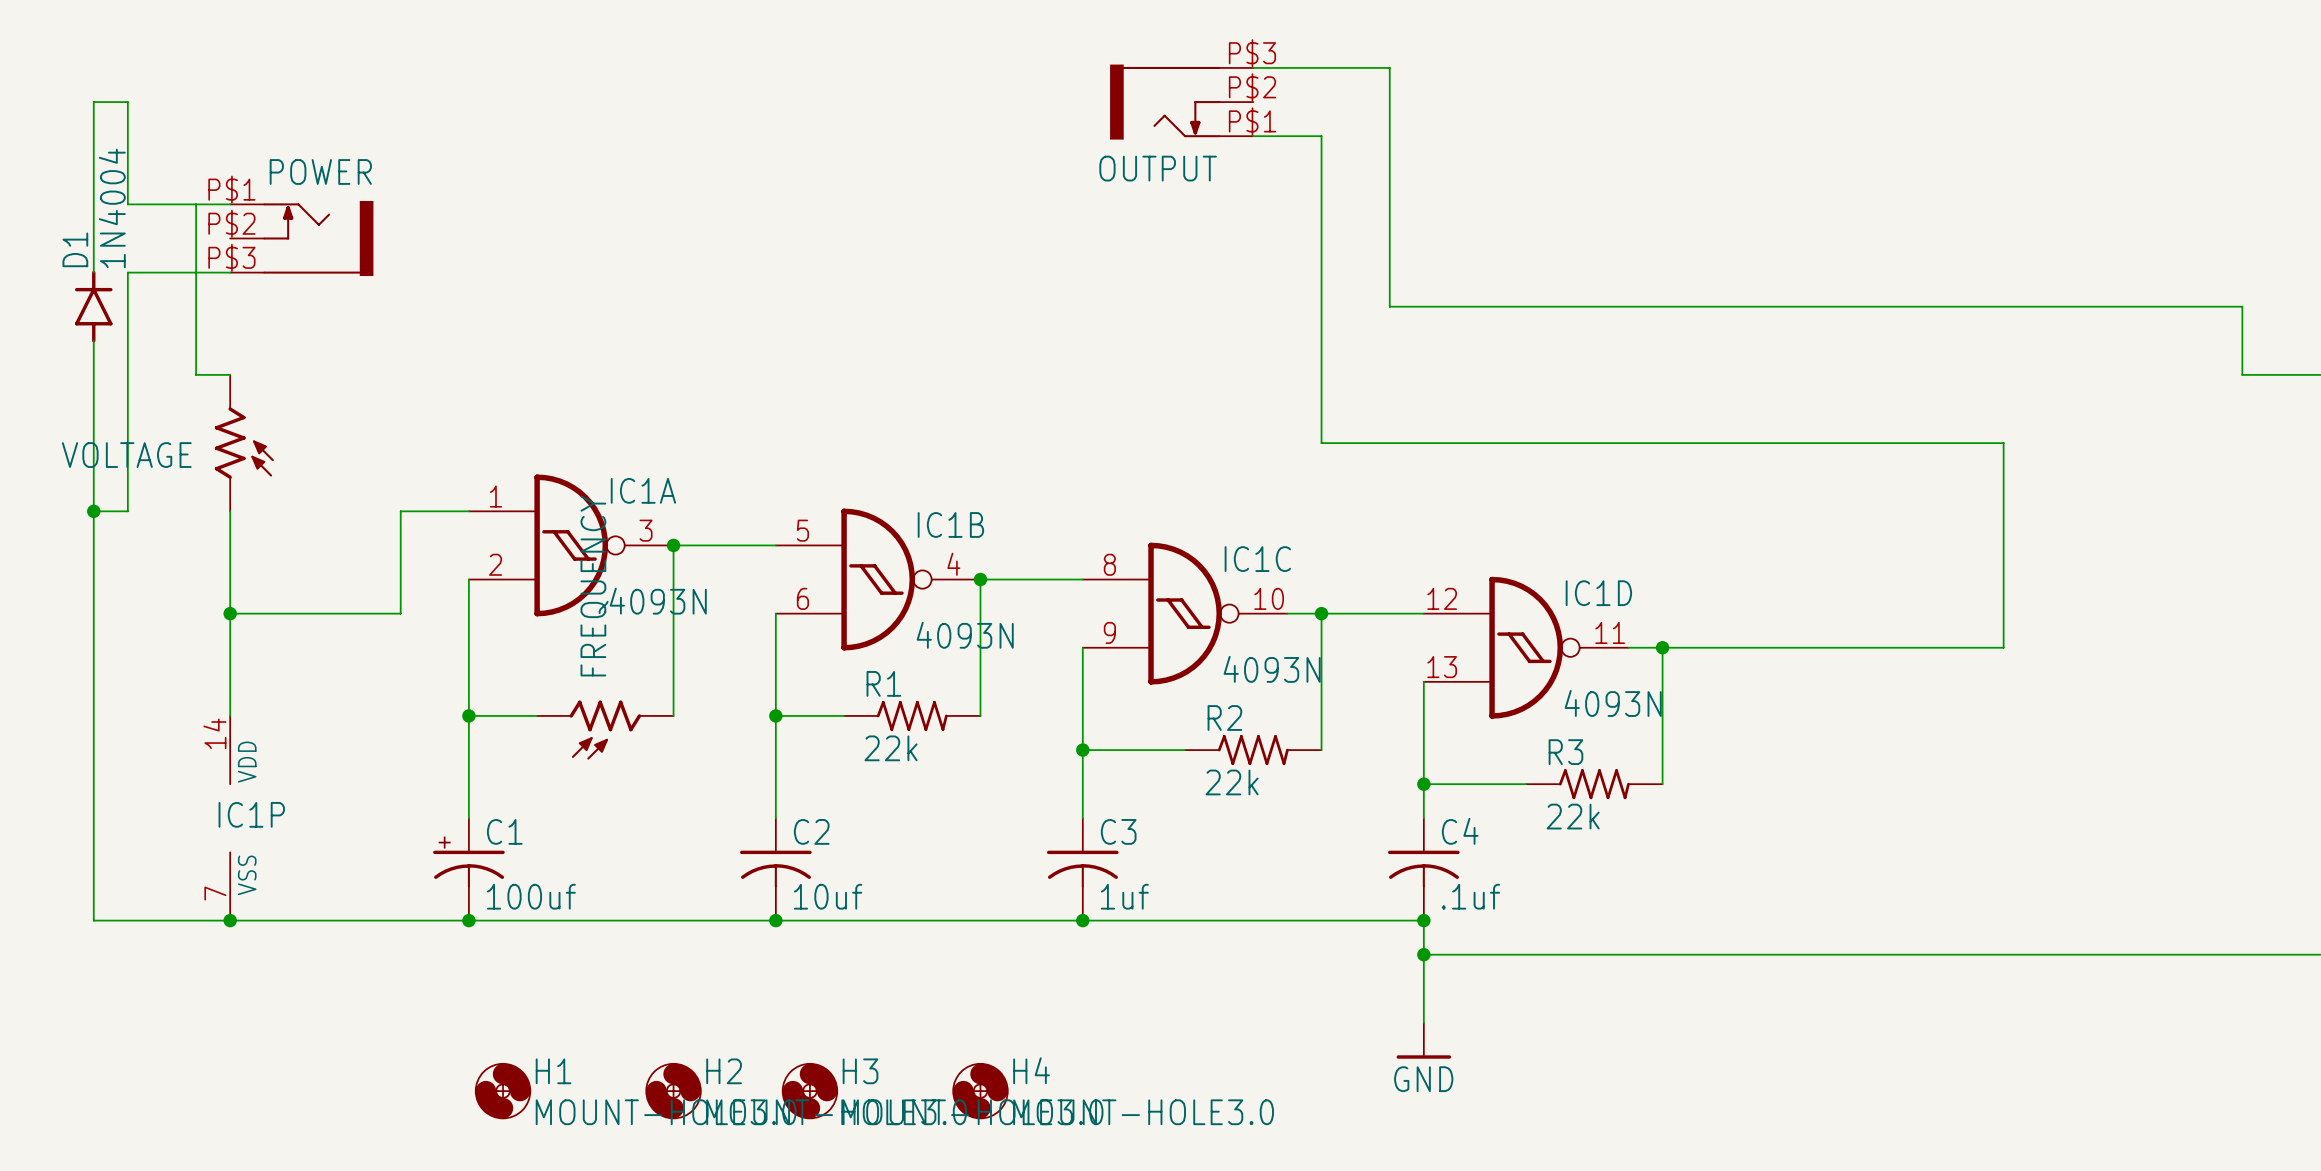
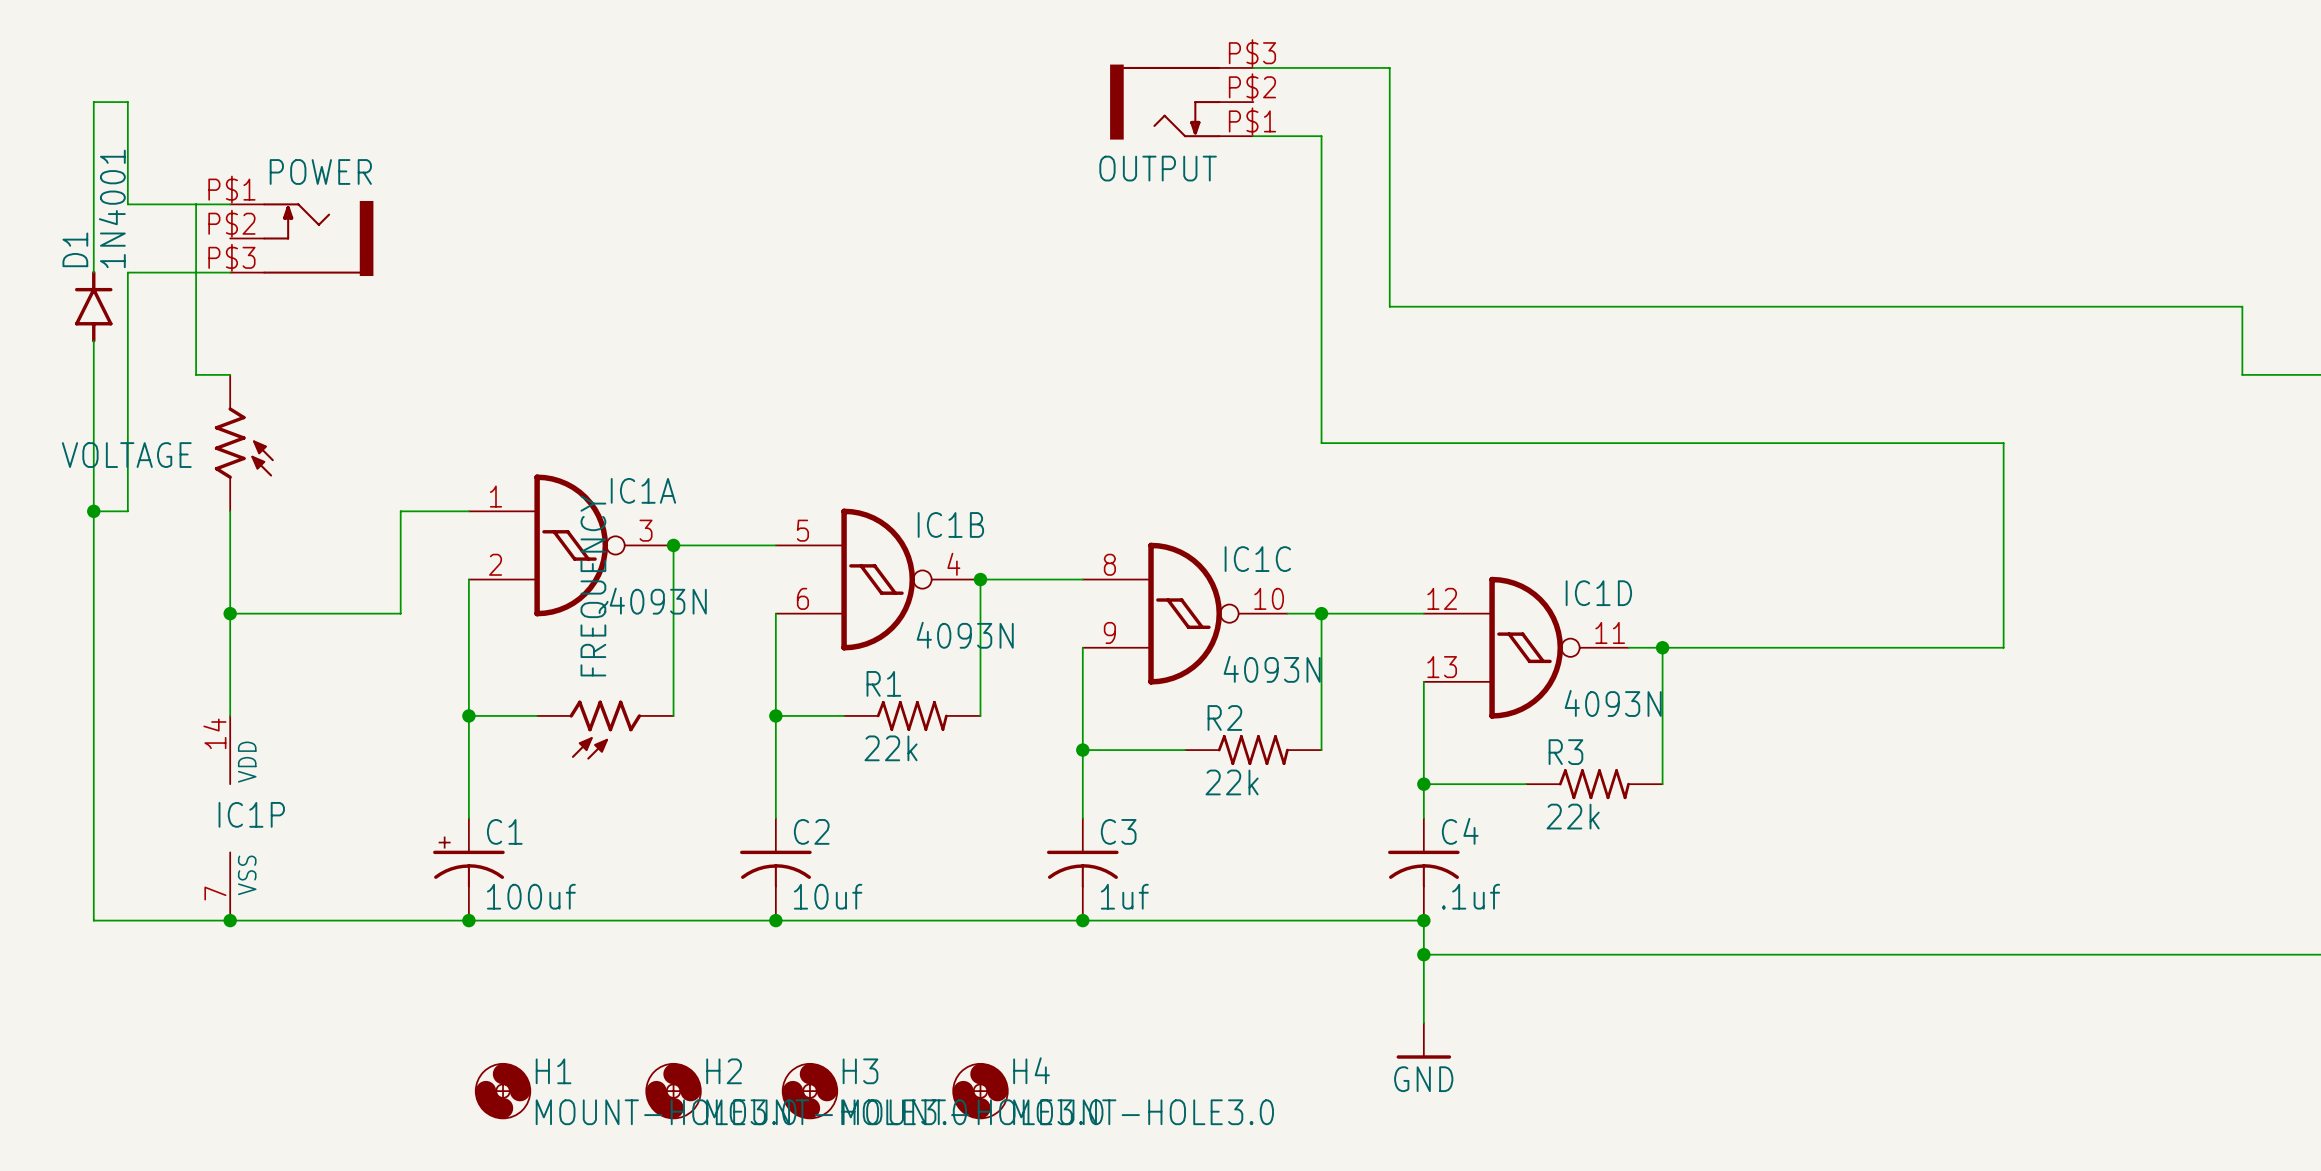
D1 value: 1N4004 (112, 208) -> 1N4001 (112, 208)

